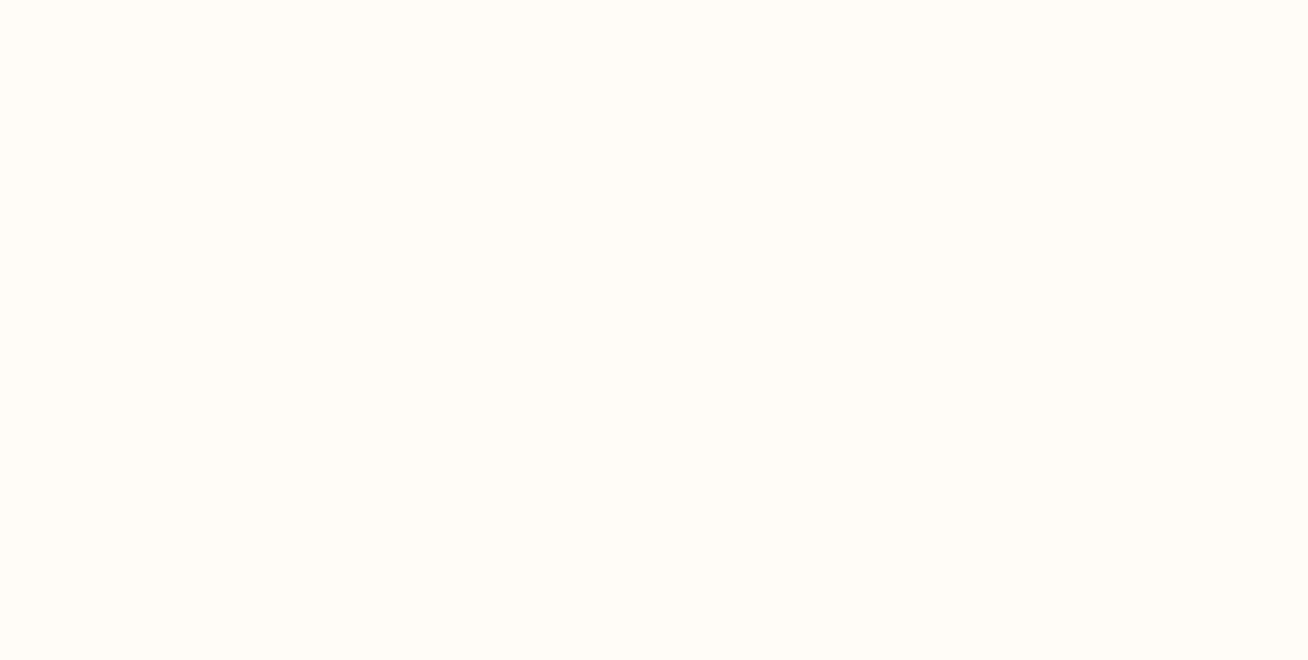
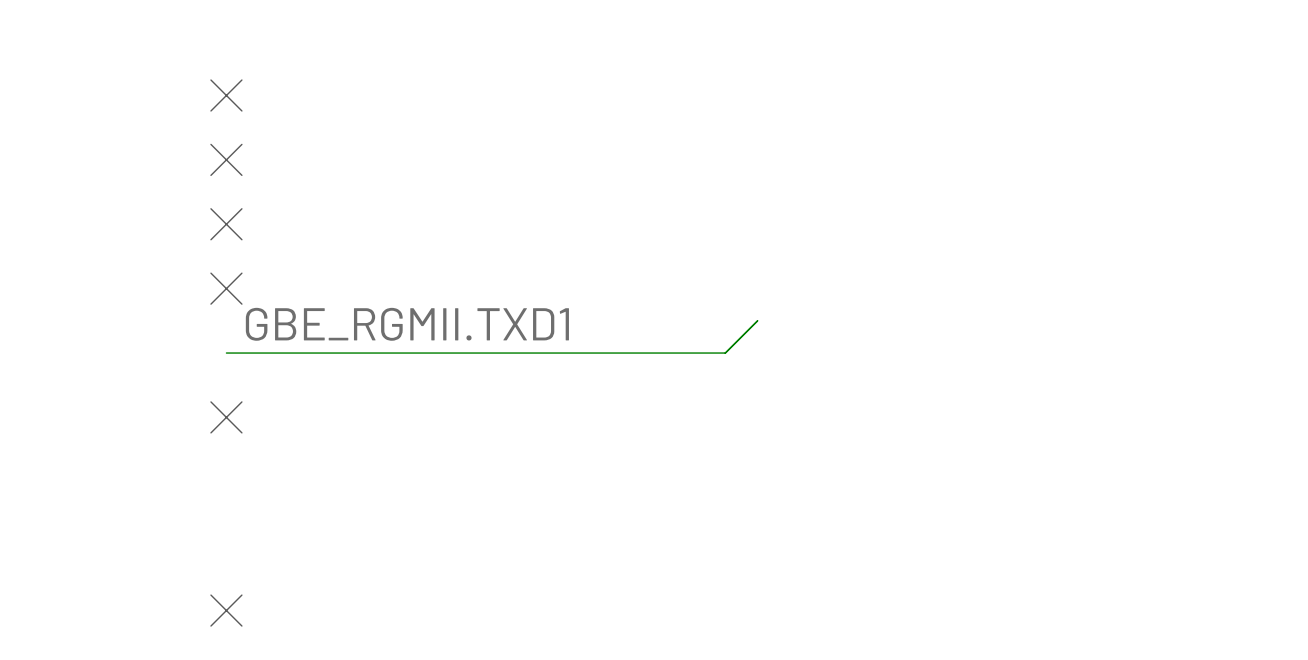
no-connect mark: none -> (226, 95)
no-connect mark: none -> (226, 159)
no-connect mark: none -> (226, 224)
no-connect mark: none -> (226, 288)
wire: none -> (757, 320) (725, 353)
label: none -> GBE_RGMII.TXD1 (407, 324)
wire: none -> (226, 353) (725, 353)
no-connect mark: none -> (226, 417)
no-connect mark: none -> (226, 610)

